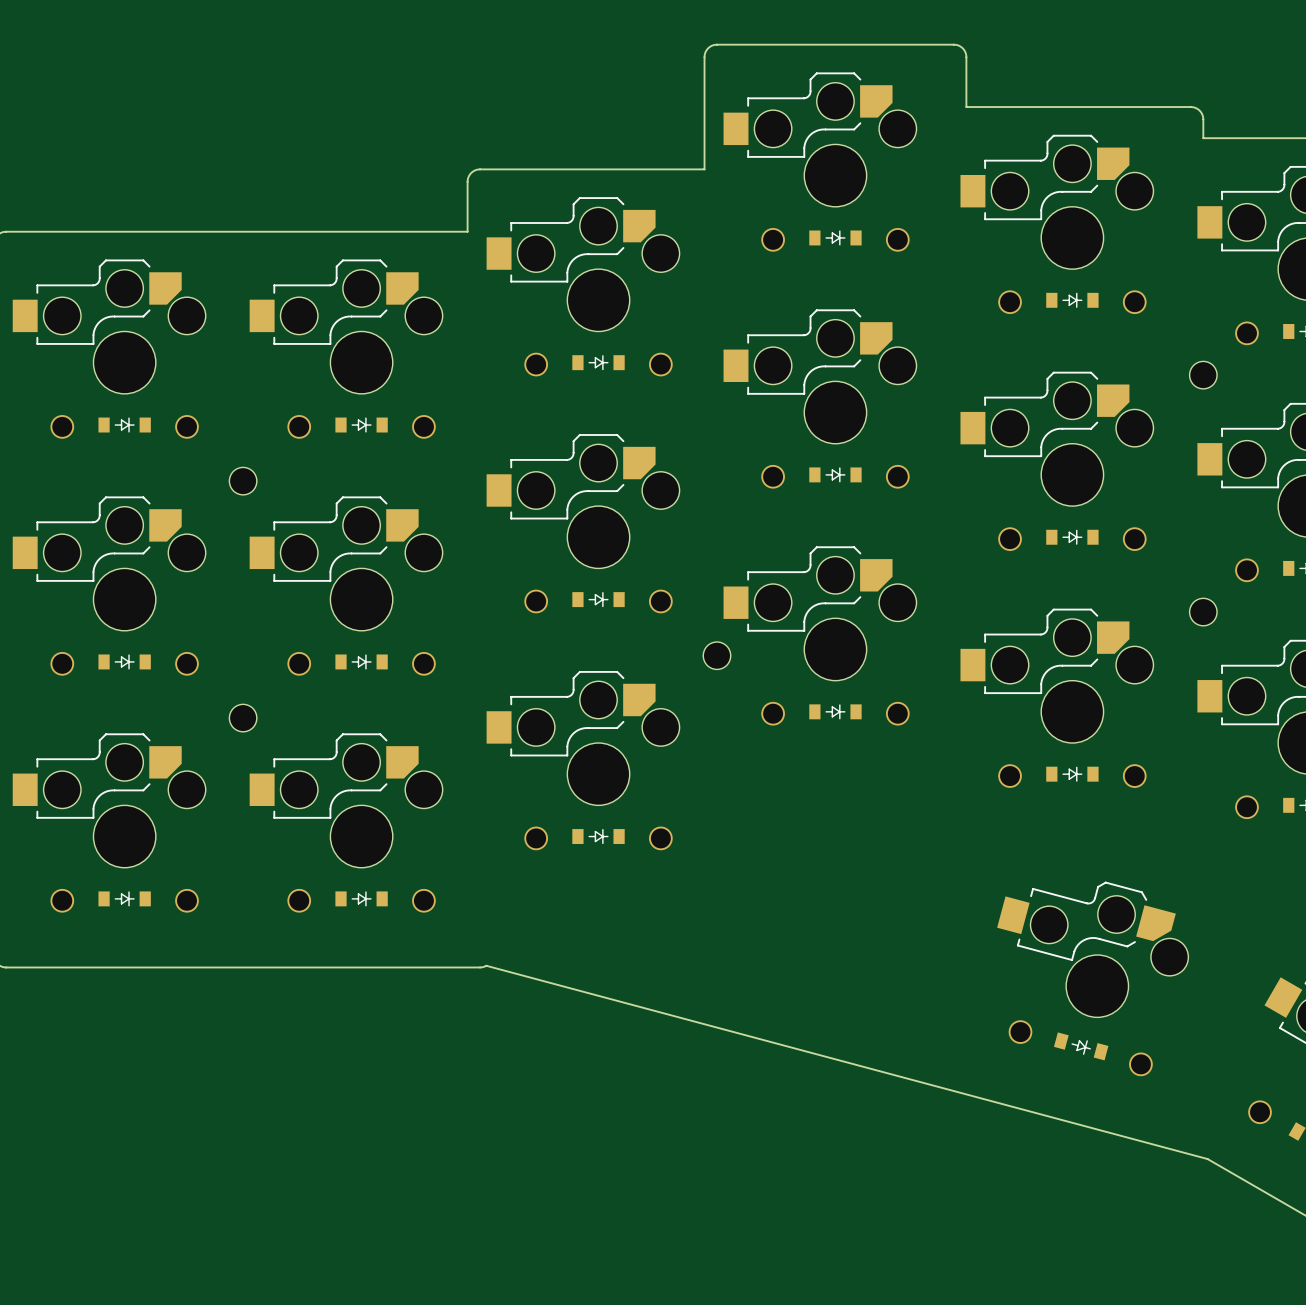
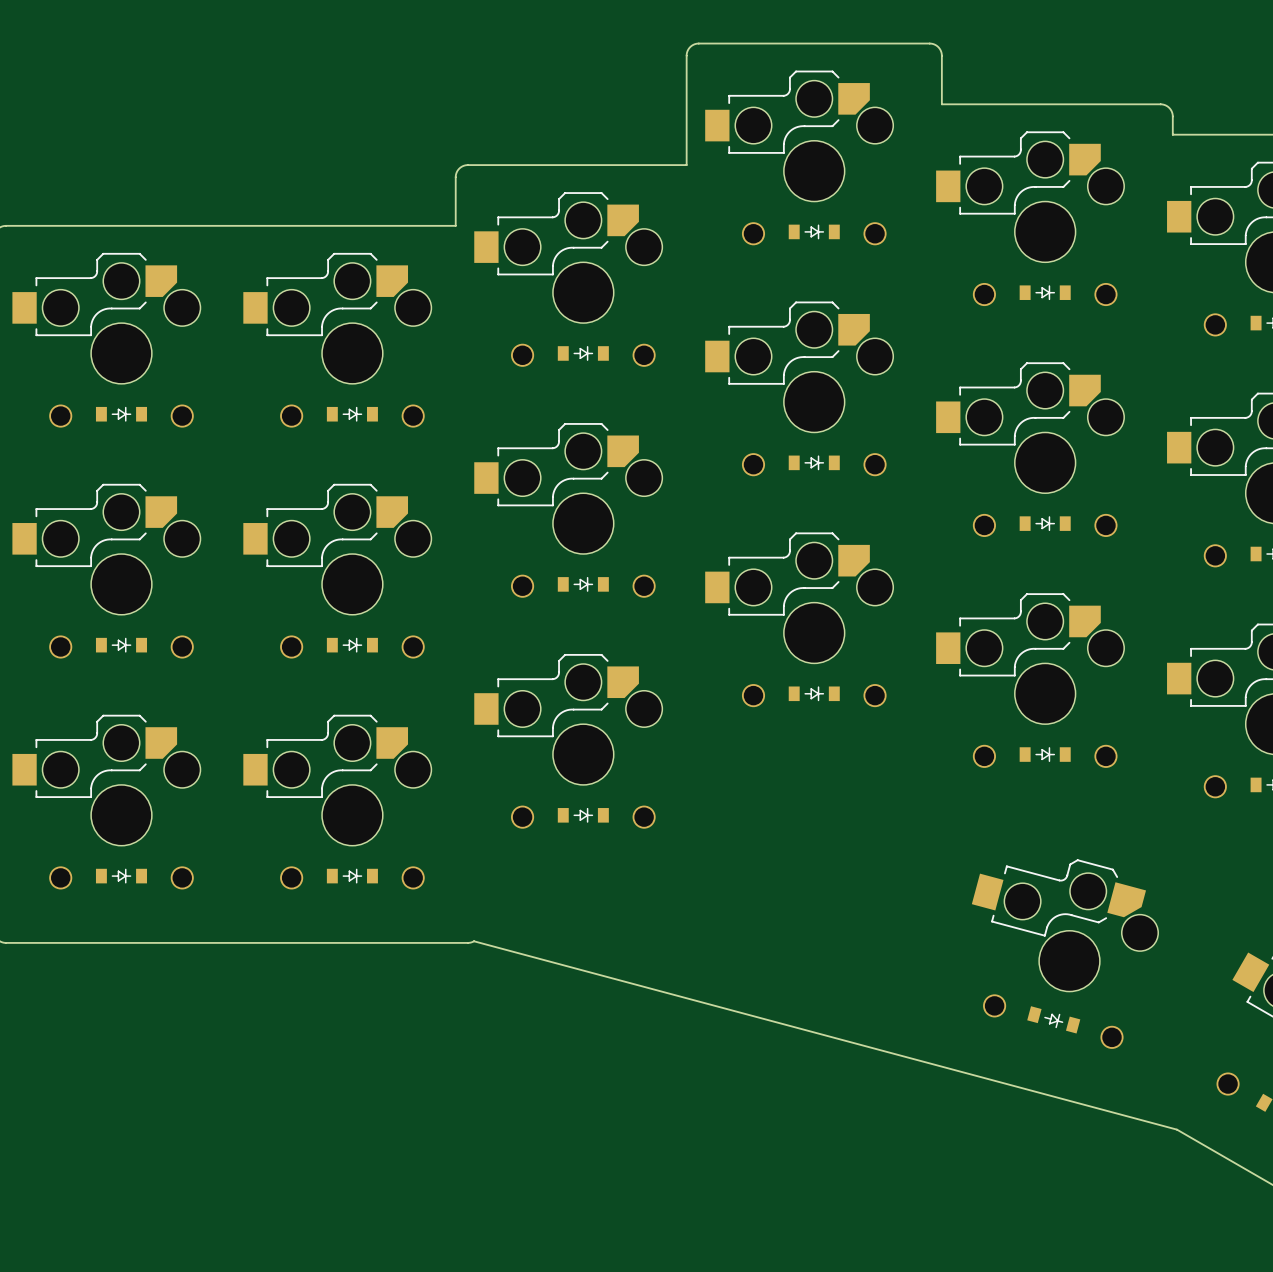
part: (1203, 375) -> none
part: (243, 481) -> none
part: (1203, 612) -> none
part: (716, 655) -> none
part: (243, 718) -> none

